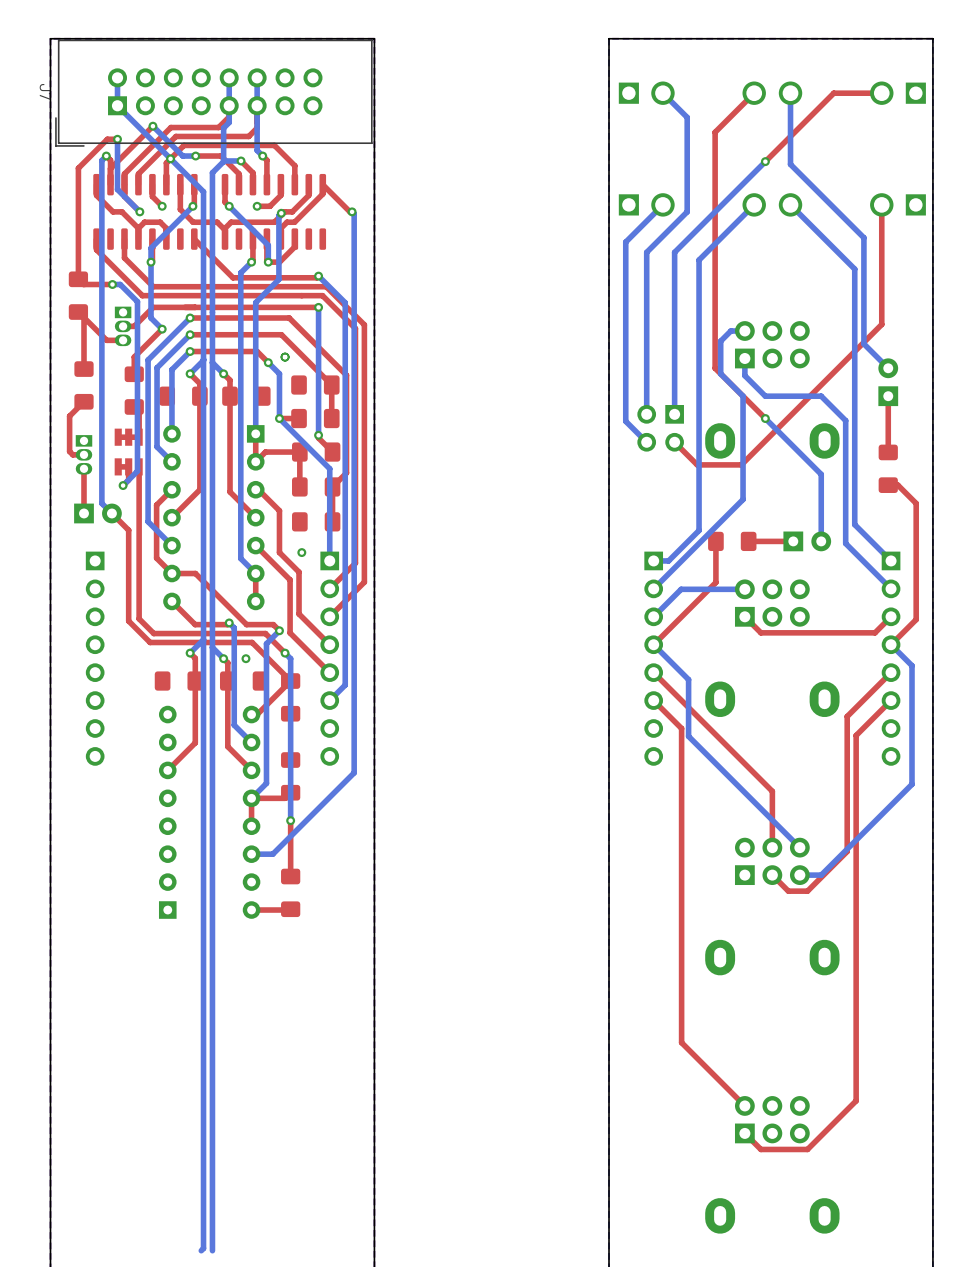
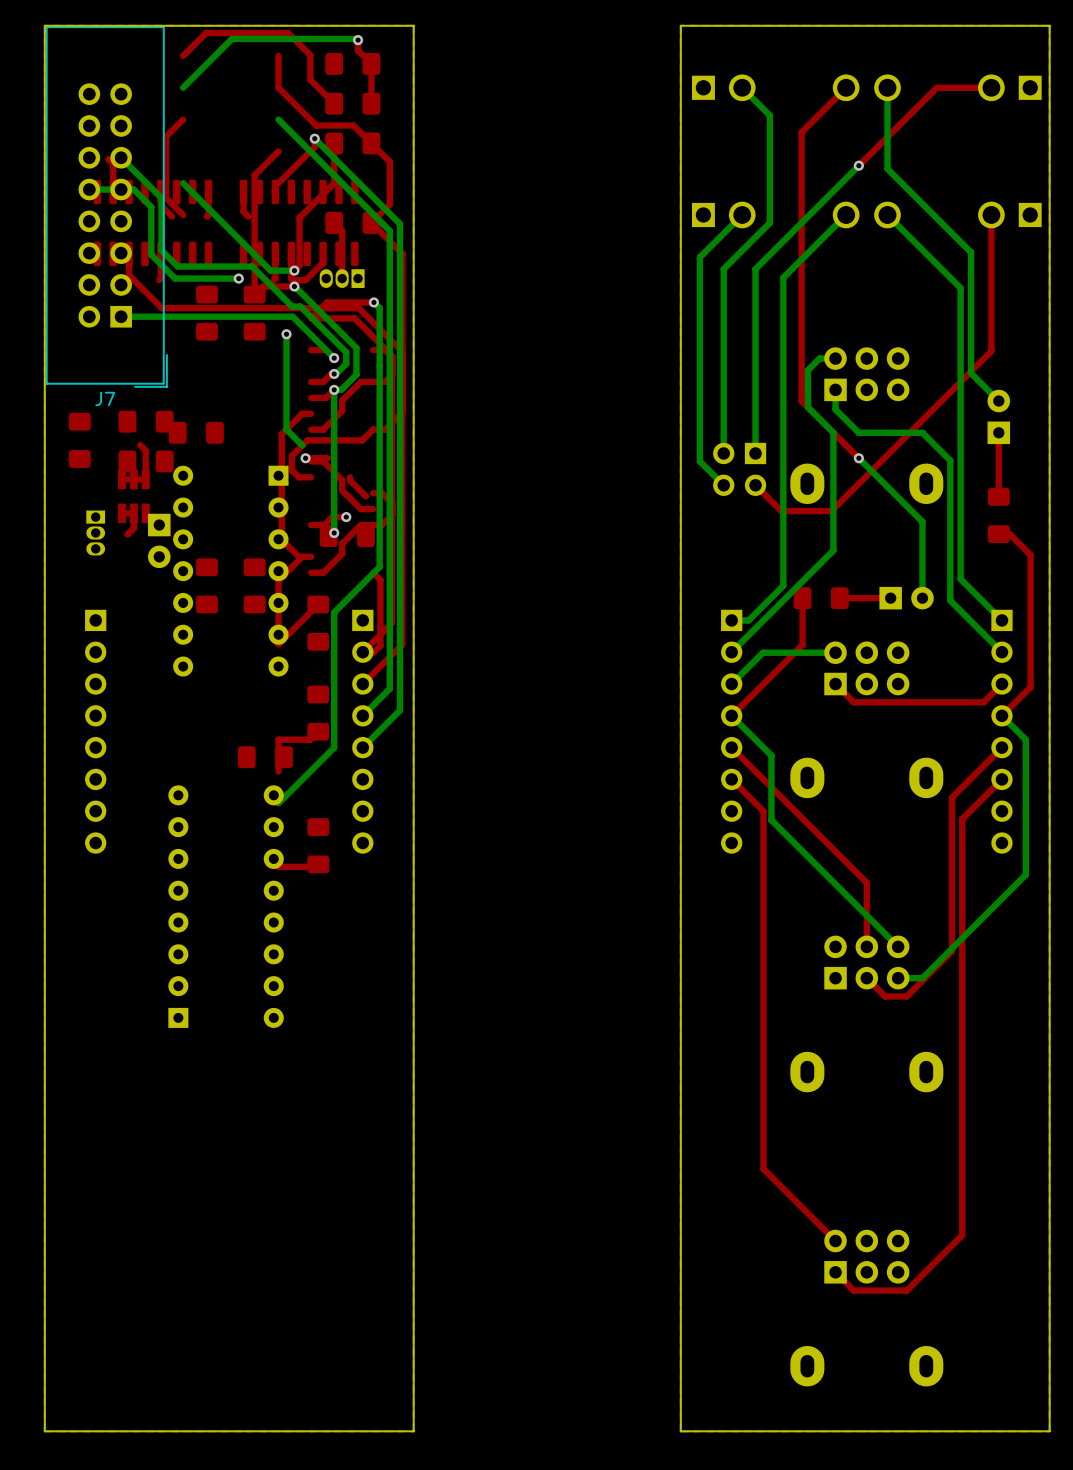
top track: none -> (358, 40) (358, 50) (371, 63) (371, 103)
bottom track: none -> (358, 40) (231, 38) (183, 87)
via: none -> (358, 40)
top track: none -> (183, 55) (206, 33) (288, 33) (310, 55) (310, 79) (334, 103)
top track: none -> (278, 55) (278, 87) (316, 125) (353, 125) (389, 161) (389, 204) (371, 222) (402, 254) (402, 412) (385, 429) (373, 429) (362, 440) (307, 440) (291, 455) (291, 470) (298, 477) (311, 477)
part: none -> (352, 63)
bottom track: (117, 77) (117, 105) (203, 191) (203, 1248) (201, 1250) -> none
bottom track: (229, 77) (229, 122) (223, 128) (223, 161) -> none
bottom track: (257, 77) (257, 150) (262, 156) -> none
J7 rotation: 0° (213, 93) -> 90° counterclockwise (106, 207)
top track: (229, 105) (229, 116) (218, 127) (170, 127) (124, 173) (124, 196) (139, 211) -> none
top track: (257, 105) (257, 128) (248, 136) (175, 136) (138, 173) (138, 184) -> none
part: none -> (352, 103)
top track: none -> (183, 119) (166, 136) (166, 197) (183, 214)
bottom track: none -> (278, 119) (389, 230) (389, 688) (362, 715)
top track: (152, 126) (110, 168) -> none
bottom track: (152, 126) (182, 156) (195, 156) -> none
via: (152, 126) -> none
top track: none -> (314, 138) (314, 147) (278, 183)
bottom track: none -> (314, 138) (400, 223) (400, 710) (362, 747)
via: none -> (314, 138)
top track: (117, 139) (107, 139) (78, 168) (78, 279) (83, 284) (112, 284) -> none
bottom track: (117, 139) (117, 189) (139, 211) -> none
via: (117, 139) -> none
top track: none -> (334, 143) (334, 183) (299, 217) (299, 265) (294, 270)
part: none -> (352, 143)
top track: none -> (278, 151) (254, 175) (254, 294) (262, 286) (294, 286)
bottom track: none -> (121, 157) (161, 198) (161, 250) (177, 266) (252, 266) (292, 306) (300, 306) (346, 352) (346, 363) (334, 373)
bottom track: (106, 156) (101, 160) (101, 503) (111, 513) -> none
via: (106, 156) -> none
top track: (195, 156) (221, 156) (238, 173) (238, 184) -> none
via: (195, 156) -> none
top track: (262, 156) (266, 160) (266, 184) -> none
via: (262, 156) -> none
via: (170, 158) -> none
top track: (241, 160) (252, 172) (252, 184) -> none
bottom track: (241, 160) (224, 160) (212, 172) (212, 1250) -> none
via: (241, 160) -> none
bottom track: none -> (183, 183) (270, 270) (294, 270)
bottom track: none -> (89, 189) (133, 189) (151, 207) (151, 254) (175, 278) (238, 278)
top track: (96, 184) (96, 195) (113, 211) (121, 211) (138, 228) -> none
top track: (180, 184) (180, 209) (193, 222) (217, 222) (225, 230) -> none
top track: (280, 184) (280, 195) (269, 206) (257, 206) -> none
top track: (294, 184) (294, 165) (274, 145) (183, 145) (166, 163) (166, 184) -> none
top track: (308, 184) (308, 195) (292, 211) (284, 211) (274, 222) (231, 222) (225, 228) (225, 239) -> none
via: (162, 206) -> none
bottom track: (192, 206) (151, 248) (151, 318) (162, 329) -> none
via: (192, 206) -> none
bottom track: (229, 206) (268, 245) (268, 262) -> none
via: (229, 206) -> none
via: (257, 206) -> none
via: (139, 211) -> none
top track: none -> (334, 222) (342, 230) (342, 278)
part: none -> (352, 222)
top track: (352, 211) (322, 184) (322, 194) (294, 222) (287, 222) (280, 228) (280, 239) -> none
bottom track: (352, 211) (354, 213) (354, 772) (272, 854) (251, 854) -> none
via: (352, 211) -> none
bottom track: (281, 213) (278, 215) (278, 279) (255, 302) (255, 433) -> none
via: (281, 213) -> none
top track: (138, 228) (144, 222) (160, 222) (166, 228) (166, 239) -> none
top track: (96, 239) (96, 249) (142, 295) (284, 295) -> (373, 302) (327, 302) (311, 318)
top track: (194, 239) (233, 277) (316, 277) (318, 276) -> none
via: none -> (294, 270)
via: none -> (238, 278)
part: none -> (342, 278)
via: (151, 262) -> none
bottom track: (251, 262) (240, 272) (240, 558) (255, 573) -> none
via: (251, 262) -> none
via: (268, 262) -> none
bottom track: none -> (294, 286) (356, 348) (356, 374) (341, 389) (334, 389) (334, 532)
via: none -> (294, 286)
bottom track: (318, 276) (345, 302) (345, 685) (329, 700) -> none
via: (318, 276) -> none
bottom track: none -> (373, 302) (379, 308) (379, 567) (334, 612) (334, 747) (278, 803)
via: none -> (373, 302)
bottom track: (112, 284) (120, 284) (137, 301) (137, 471) (123, 485) -> none
via: (112, 284) -> none
part: none -> (206, 313)
part: none -> (254, 313)
bottom track: none -> (121, 316) (292, 316) (334, 358)
part: (78, 295) -> none
top track: (318, 307) (153, 307) (134, 326) (123, 326) -> none
bottom track: (318, 307) (318, 435) -> none
via: (318, 307) -> none
bottom track: none -> (286, 334) (286, 429) (302, 445)
via: none -> (286, 334)
top track: (78, 312) (106, 340) (123, 340) -> none
top track: (84, 317) (84, 369) -> none
top track: (190, 318) (289, 318) (346, 375) (346, 472) (332, 486) (332, 521) -> none
bottom track: (190, 318) (148, 360) (148, 521) (171, 545) -> none
via: (190, 318) -> none
top track: none -> (311, 350) (326, 350) (334, 358)
top track: none -> (373, 350) (385, 350) (392, 357) (392, 374) (385, 381) (360, 381) (342, 400) (342, 410) (323, 429) (311, 429)
part: (123, 326) -> none
top track: (162, 329) (134, 357) (134, 374) -> none
via: (162, 329) -> none
via: none -> (334, 358)
top track: (190, 334) (281, 334) (331, 385) (331, 418) -> none
bottom track: (190, 334) (157, 367) (157, 446) (171, 461) -> none
via: (190, 334) -> none
top track: none -> (334, 373) (331, 373) (323, 381) (311, 381)
via: none -> (334, 373)
top track: (190, 351) (257, 351) (268, 362) -> none
bottom track: (190, 351) (171, 369) (171, 433) -> none
via: (190, 351) -> none
via: (285, 357) -> none
top track: none -> (334, 389) (326, 397) (311, 397)
via: none -> (334, 389)
bottom track: (203, 360) (190, 373) -> none
bottom track: (212, 362) (223, 373) -> none
bottom track: (268, 362) (279, 373) (279, 418) (329, 468) (329, 560) -> none
via: (268, 362) -> none
top track: (190, 373) (199, 383) (199, 489) (171, 517) -> none
via: (190, 373) -> none
top track: (223, 373) (230, 380) (230, 491) (255, 517) -> none
via: (223, 373) -> none
top track: none -> (311, 413) (302, 413) (281, 434) (281, 539) (298, 556) (311, 556)
part position: (84, 385) -> (79, 440)
part: (315, 385) -> none
part rotation: 0° (134, 390) -> 90° clockwise (146, 421)
part: (246, 396) -> none
top track: (84, 401) (69, 416) (69, 451) (72, 454) (84, 454) -> none
part: (315, 418) -> none
part: none -> (146, 461)
top track: none -> (311, 461) (323, 461) (342, 480) (342, 490) (360, 509) (373, 509)
top track: (255, 433) (255, 461) (265, 452) (299, 452) (299, 486) -> none
via: (318, 435) -> none
top track: none -> (373, 493) (381, 493) (392, 503) (392, 514) (381, 525) (360, 525) (342, 543) (342, 553) (323, 572) (311, 572)
part: (316, 452) -> none
part position: (84, 454) -> (95, 532)
top track: (139, 466) (139, 618) (153, 633) (265, 633) (285, 653) -> none
top track: (84, 468) (84, 513) -> none
top track: none -> (346, 517) (332, 517) (324, 525) (311, 525)
via: none -> (346, 517)
via: none -> (334, 532)
via: (123, 485) -> none
top track: (171, 489) (156, 505) (156, 558) (171, 573) (195, 573) (246, 624) (273, 624) (279, 630) -> none
top track: (255, 489) (258, 489) (279, 510) (279, 552) (299, 572) (299, 614) (329, 644) -> none
top track: none -> (302, 556) (278, 580) (278, 634)
part rotation: 0° (97, 513) -> 90° clockwise (159, 540)
part position: (97, 513) -> (159, 540)
top track: (111, 513) (128, 530) (128, 621) (150, 642) (252, 642) (290, 681) (257, 714) (251, 714) -> none
top track: none -> (373, 572) (380, 580) (380, 645) (373, 652) (364, 652)
part: (316, 521) -> none
part: none -> (206, 585)
part: none -> (254, 585)
top track: (255, 545) (290, 579) (290, 633) (329, 672) -> none
via: (301, 552) -> none
part: none -> (318, 623)
top track: (255, 581) (255, 601) -> (278, 644) (318, 604)
top track: (171, 601) (195, 624) (227, 624) (229, 622) -> none
bottom track: (229, 622) (234, 627) (234, 725) (251, 742) -> none
via: (229, 622) -> none
bottom track: (279, 630) (266, 643) (266, 783) (251, 798) -> none
via: (279, 630) -> none
bottom track: (203, 639) (190, 653) -> none
part: none -> (318, 713)
bottom track: (212, 647) (223, 658) -> none
top track: (190, 653) (195, 658) (195, 742) (167, 770) -> none
via: (190, 653) -> none
bottom track: (285, 653) (290, 658) (290, 820) -> none
via: (285, 653) -> none
top track: (223, 658) (227, 662) (227, 746) (251, 770) -> none
via: (223, 658) -> none
via: (245, 658) -> none
top track: none -> (318, 731) (310, 739) (278, 739) (278, 771)
part: (178, 681) -> none
part: (290, 697) -> none
top track: none -> (318, 864) (315, 866) (278, 866)
part position: (290, 776) -> (318, 845)
top track: (290, 792) (285, 798) (251, 798) (251, 826) -> none
top track: (290, 820) (290, 876) -> none
via: (290, 820) -> none
part: (290, 892) -> none
top track: (290, 909) (251, 910) -> none

